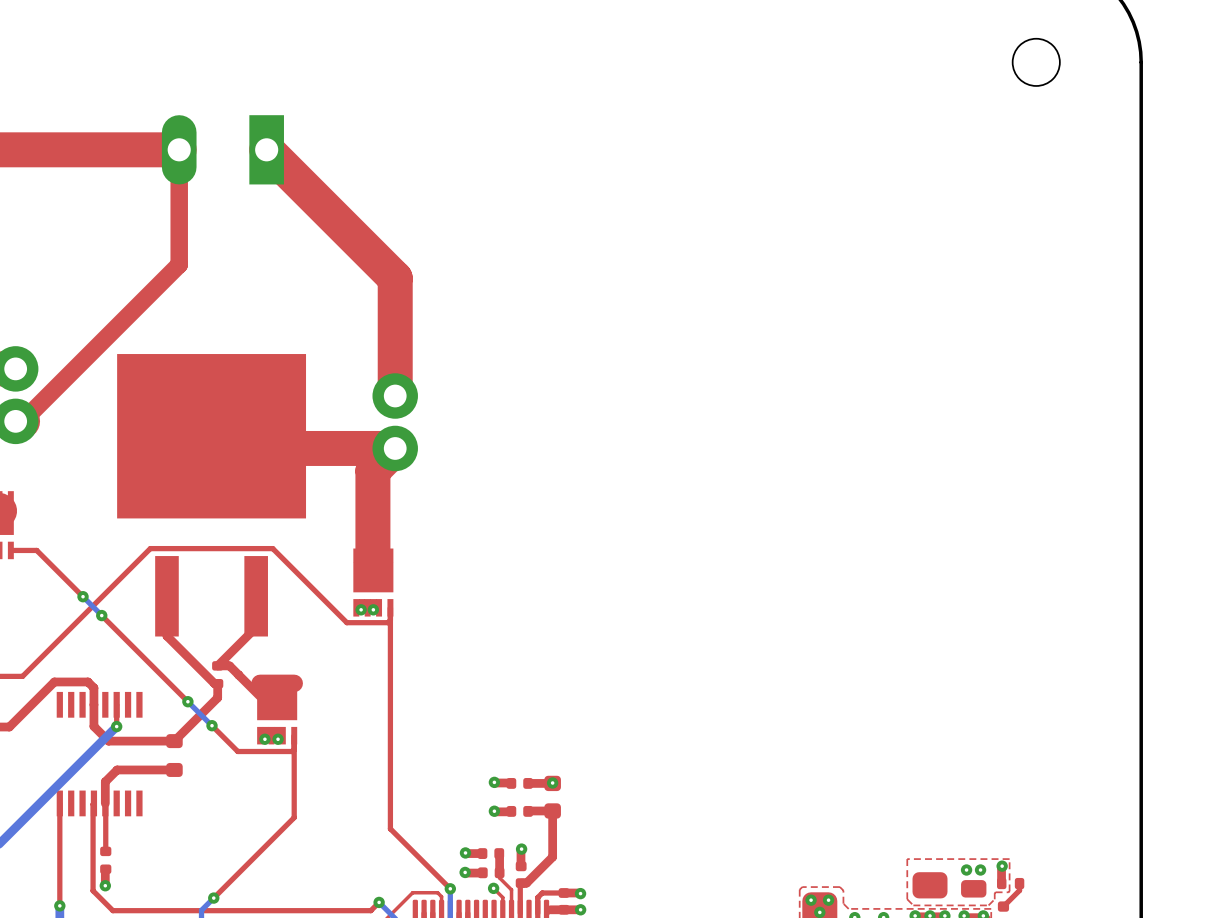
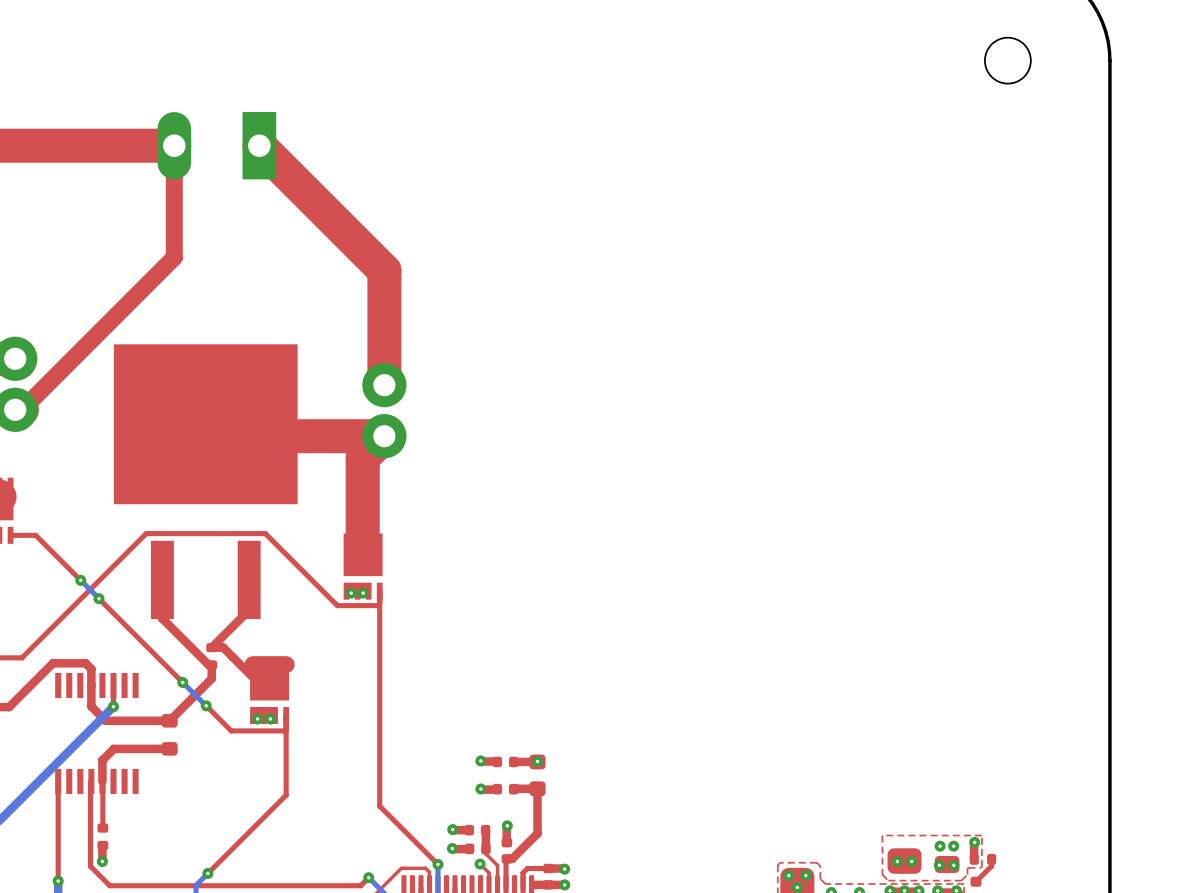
via: none -> (897, 861)
via: none -> (911, 861)
via: none -> (939, 865)
via: none -> (953, 865)

